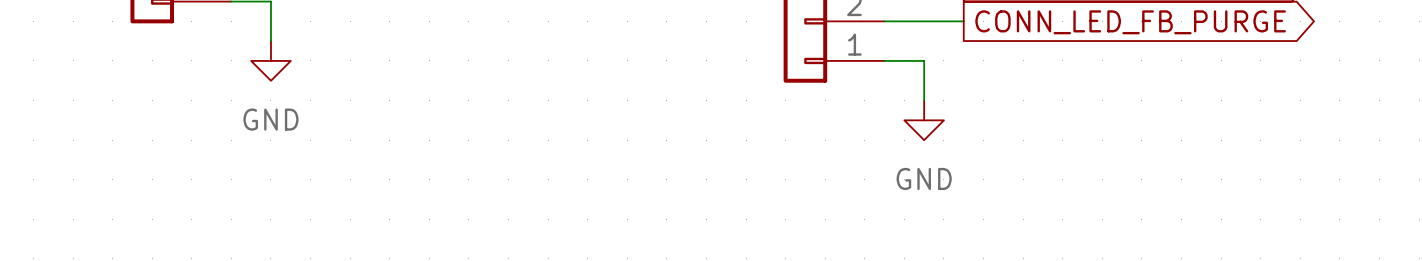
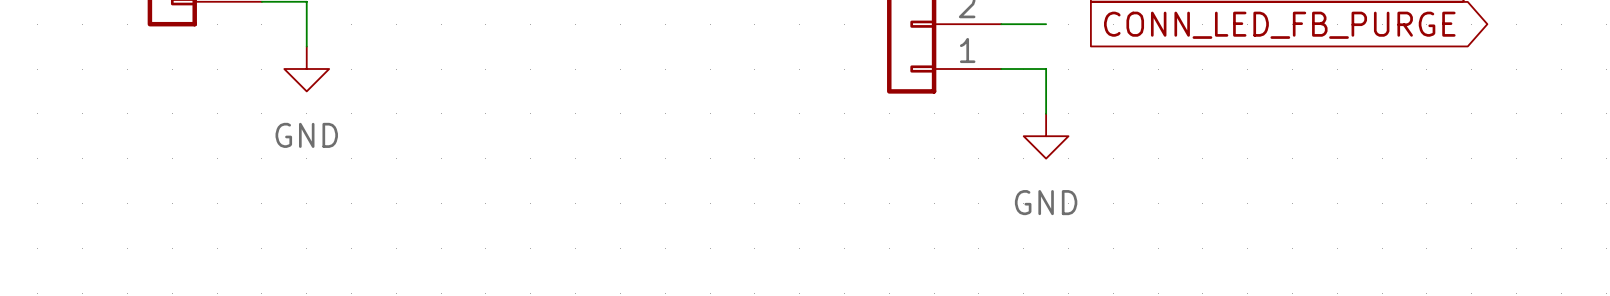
wire: (924, 21) (963, 21) -> none

